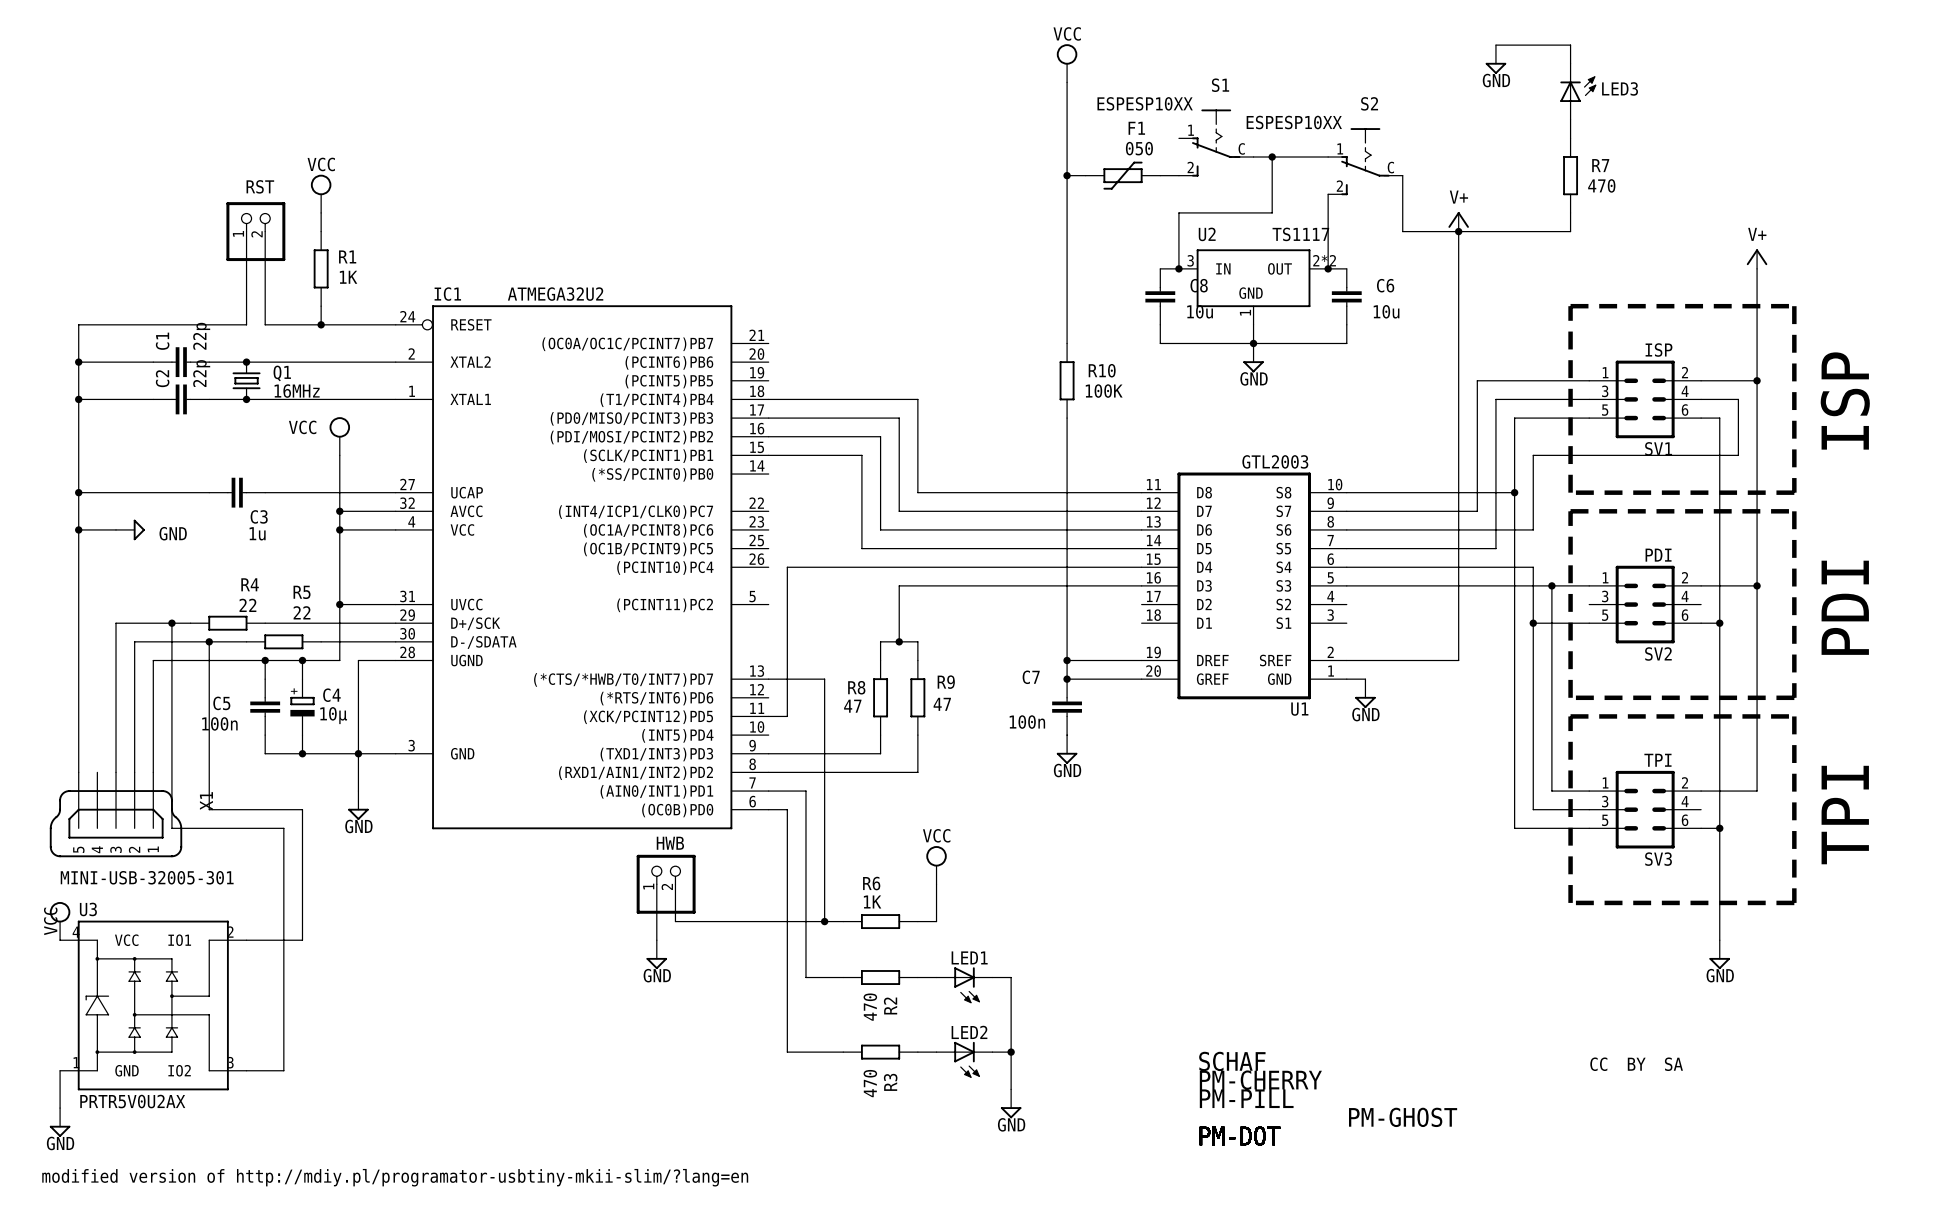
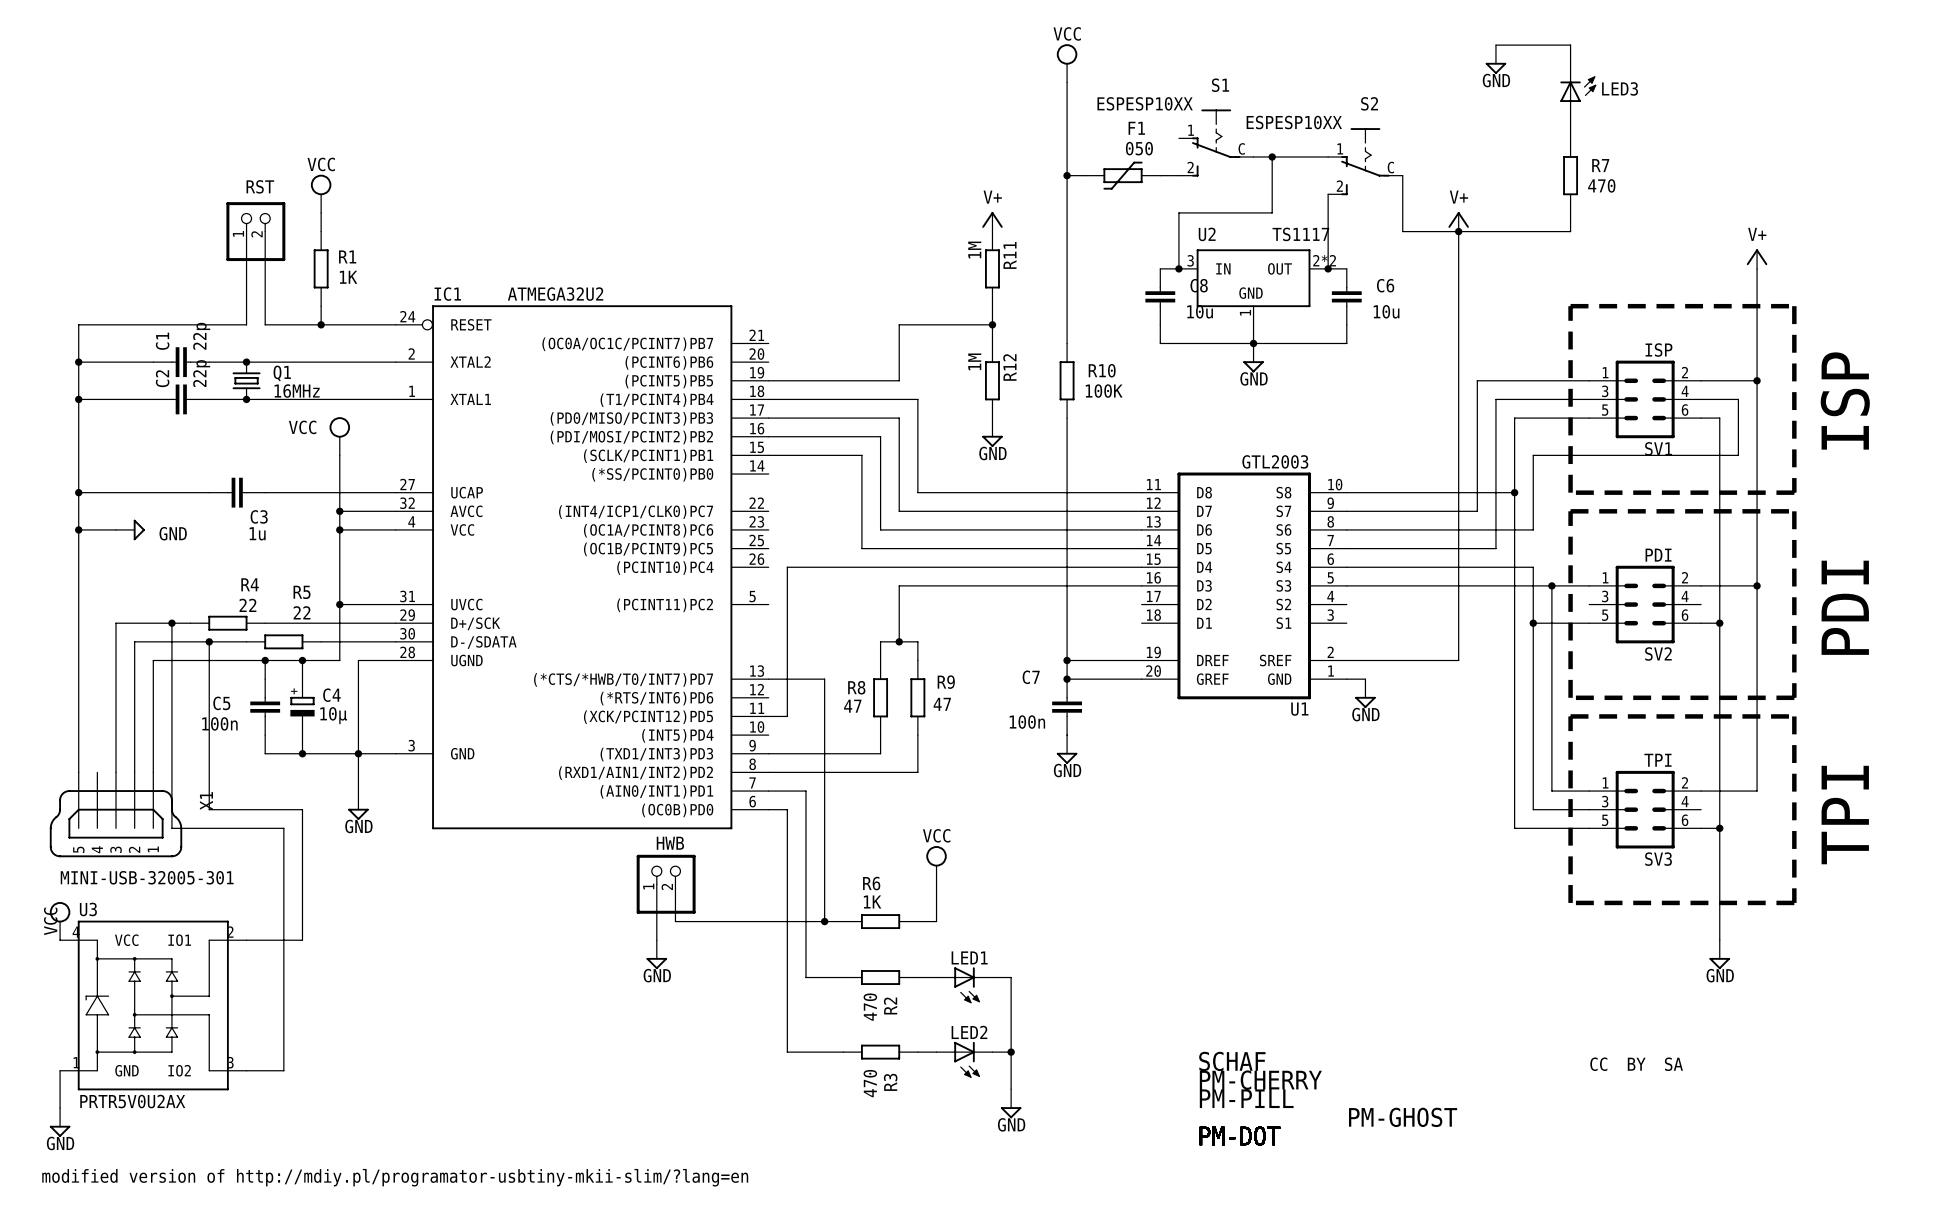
power symbol: none -> V+ (992, 221)
R11: none -> 1M (992, 268)
wire: none -> (992, 306) (992, 343)
wire: none -> (992, 324) (899, 324) (899, 380) (768, 380)
junction: none -> (992, 324)
R12: none -> 1M (992, 380)
power symbol: none -> GND (992, 432)

